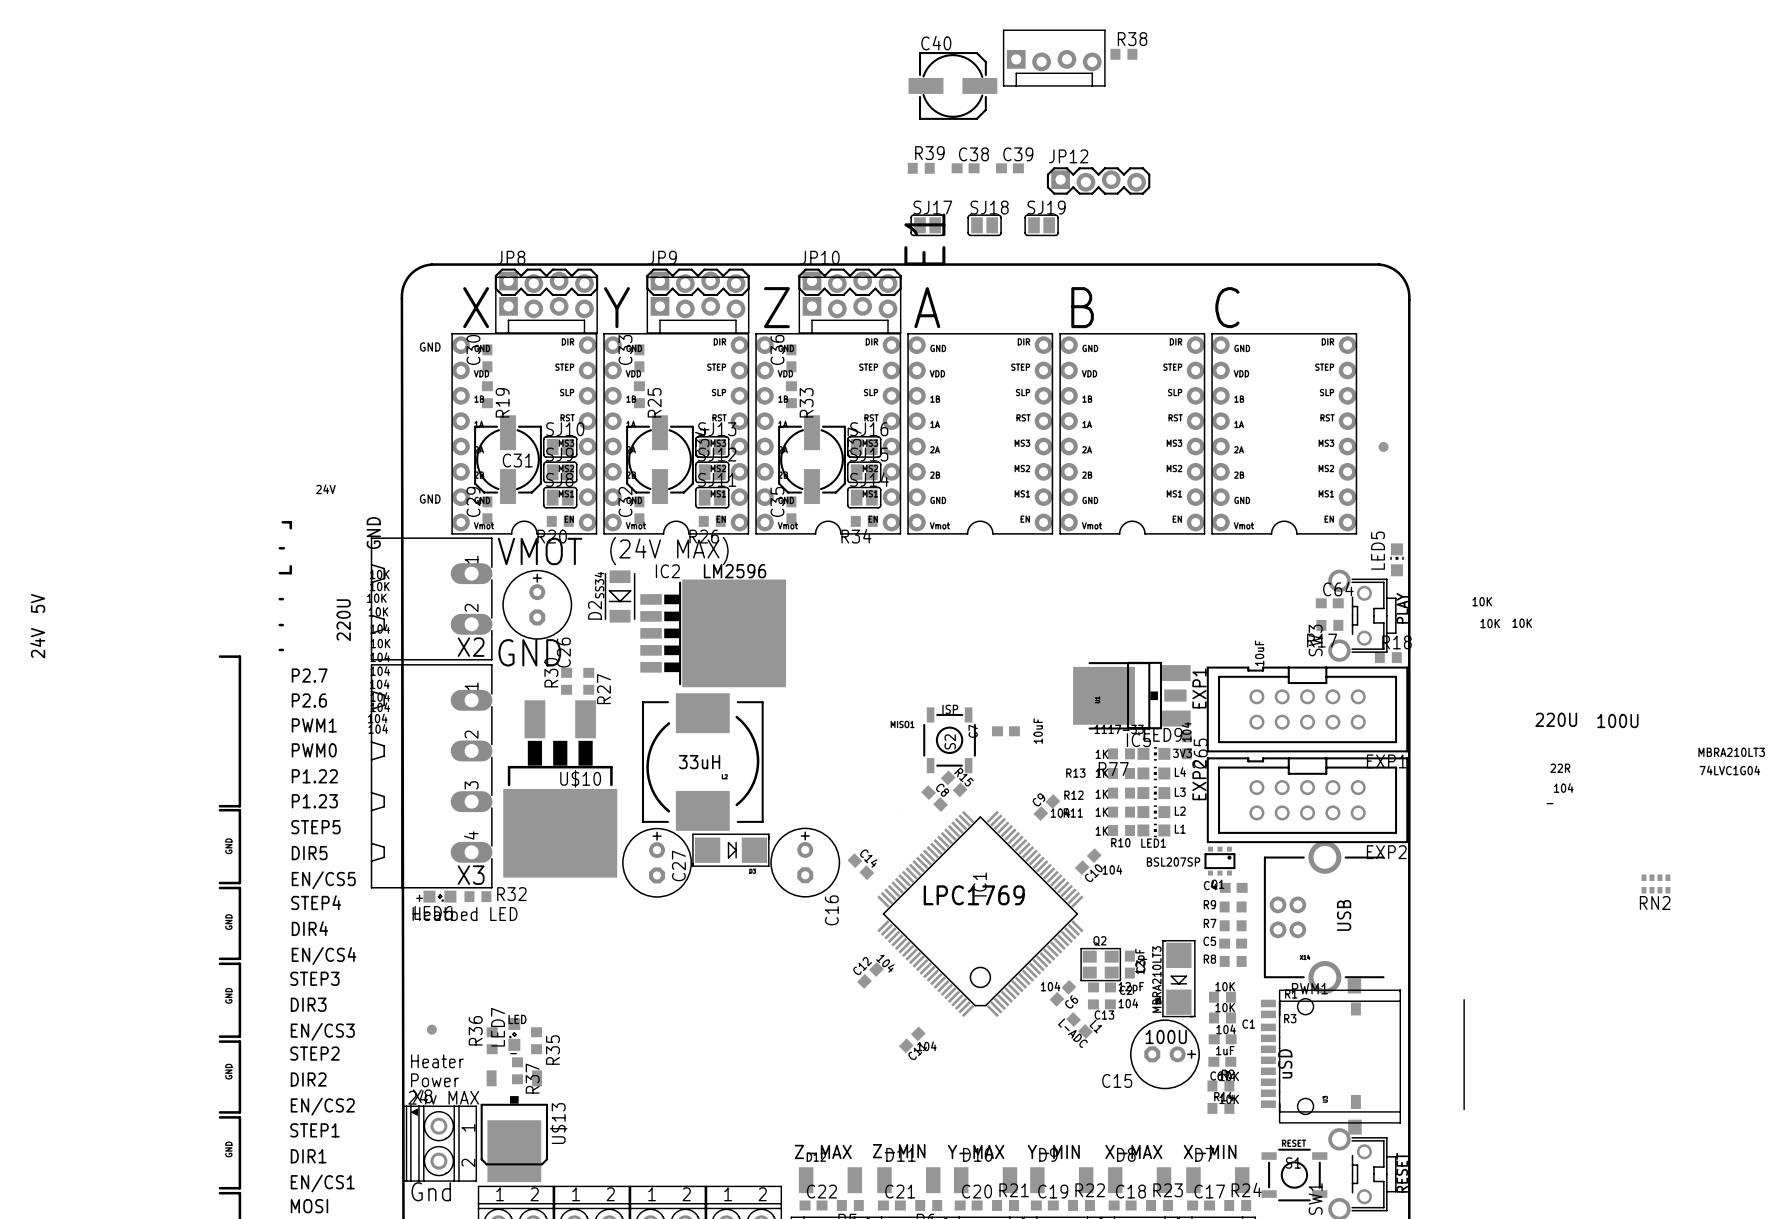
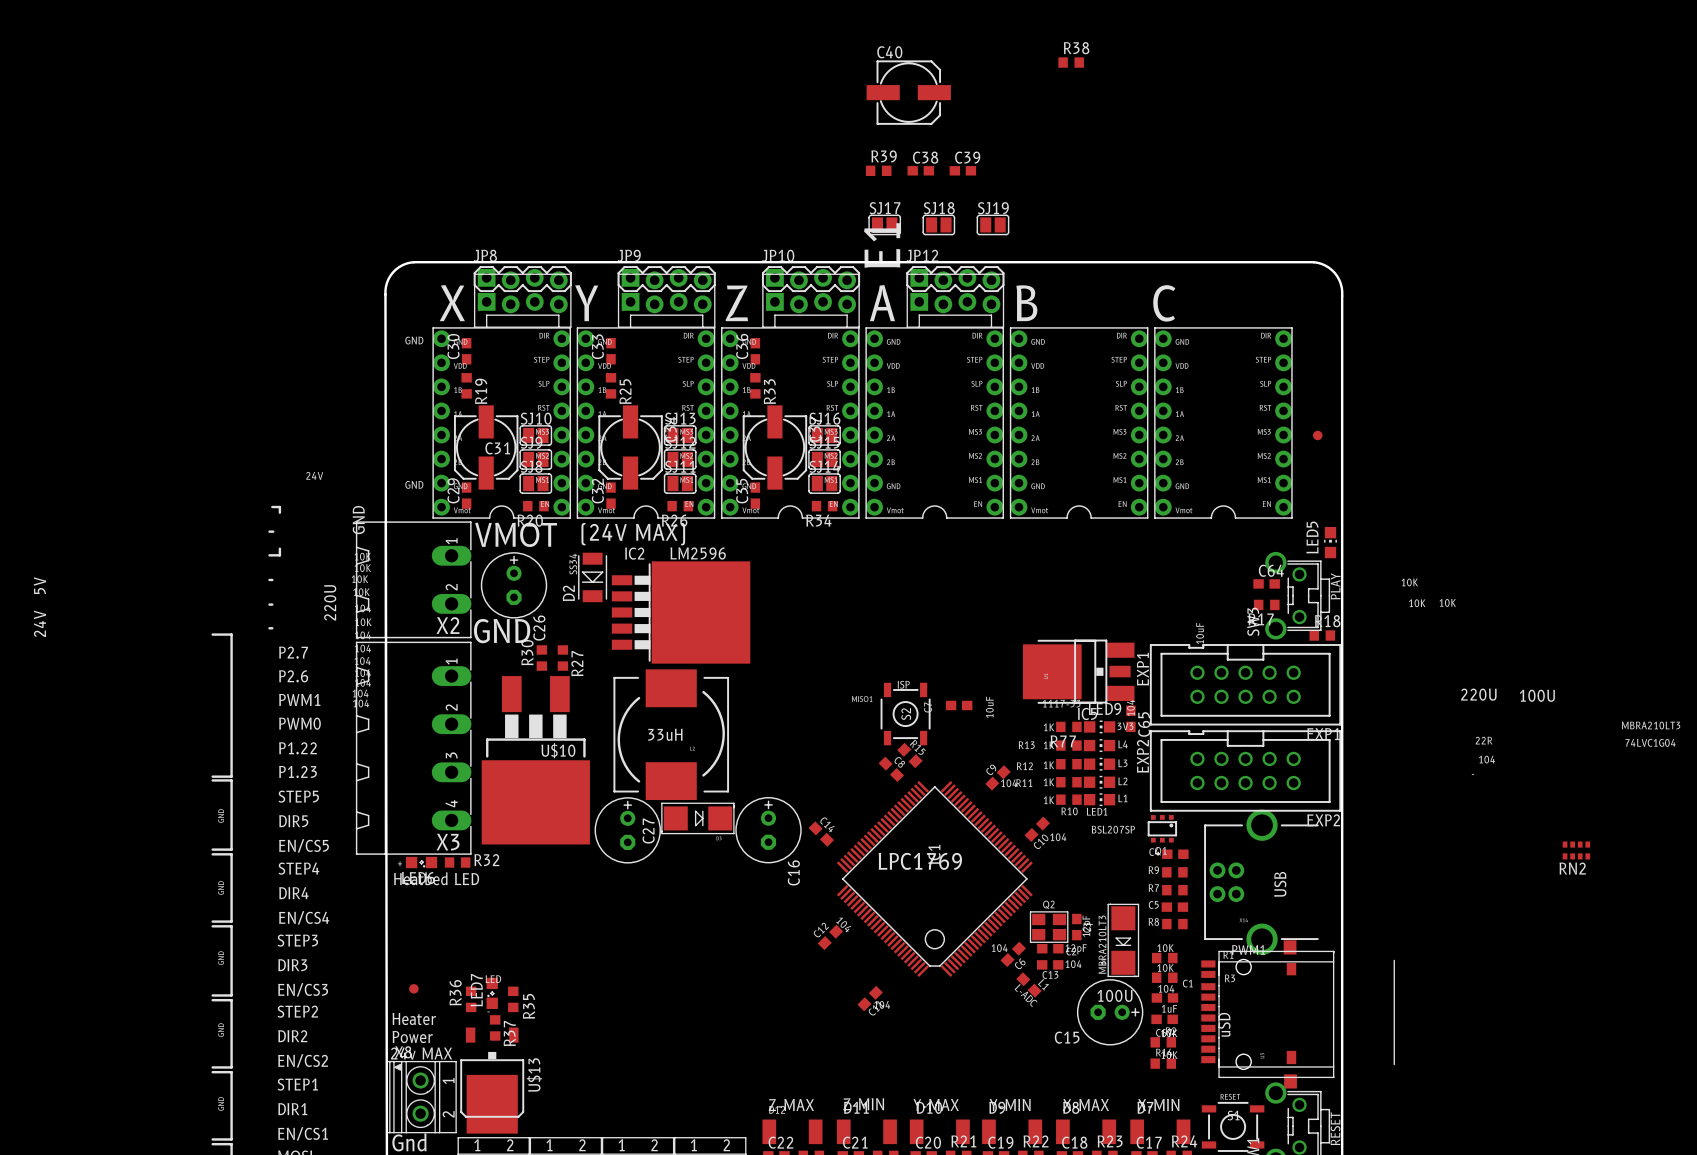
part: (1054, 58) -> none
JP12 position: (1098, 180) -> (955, 279)
part: none -> (955, 300)

